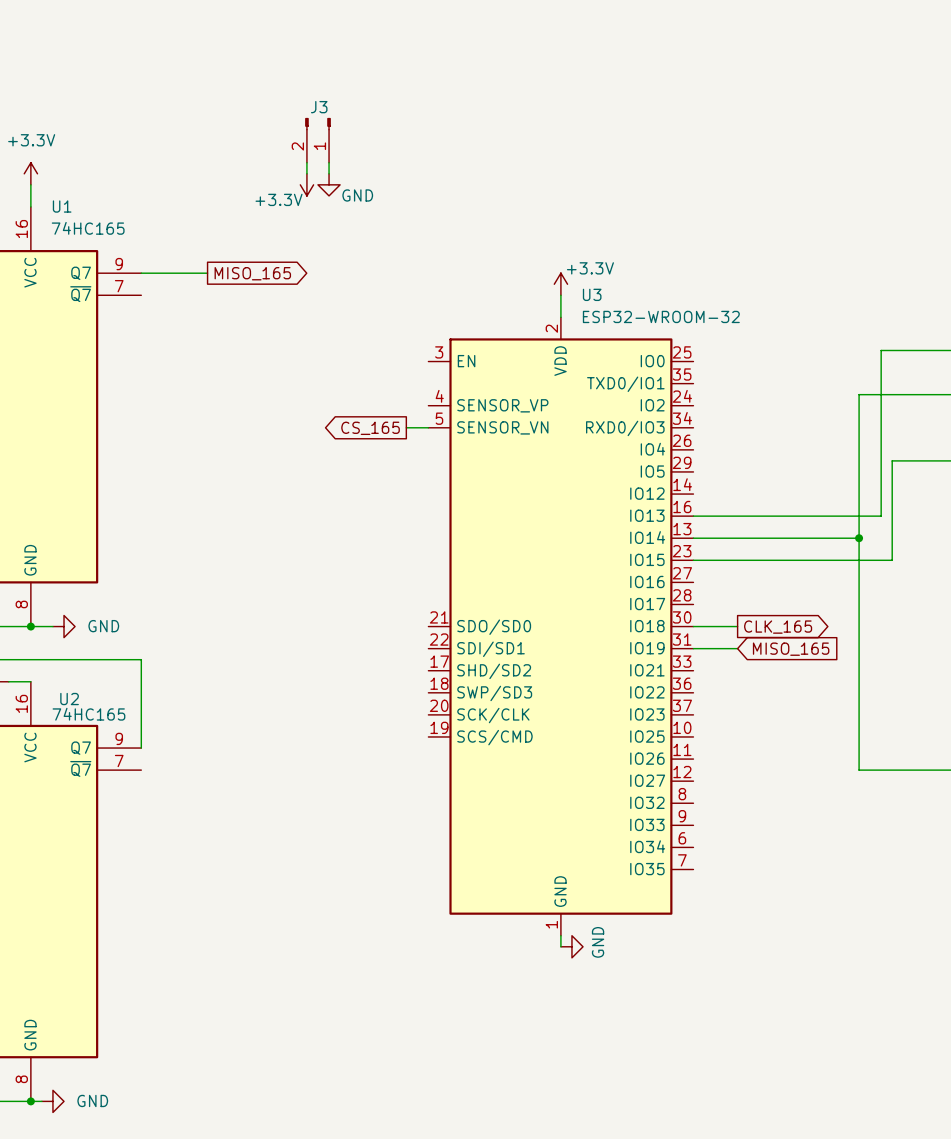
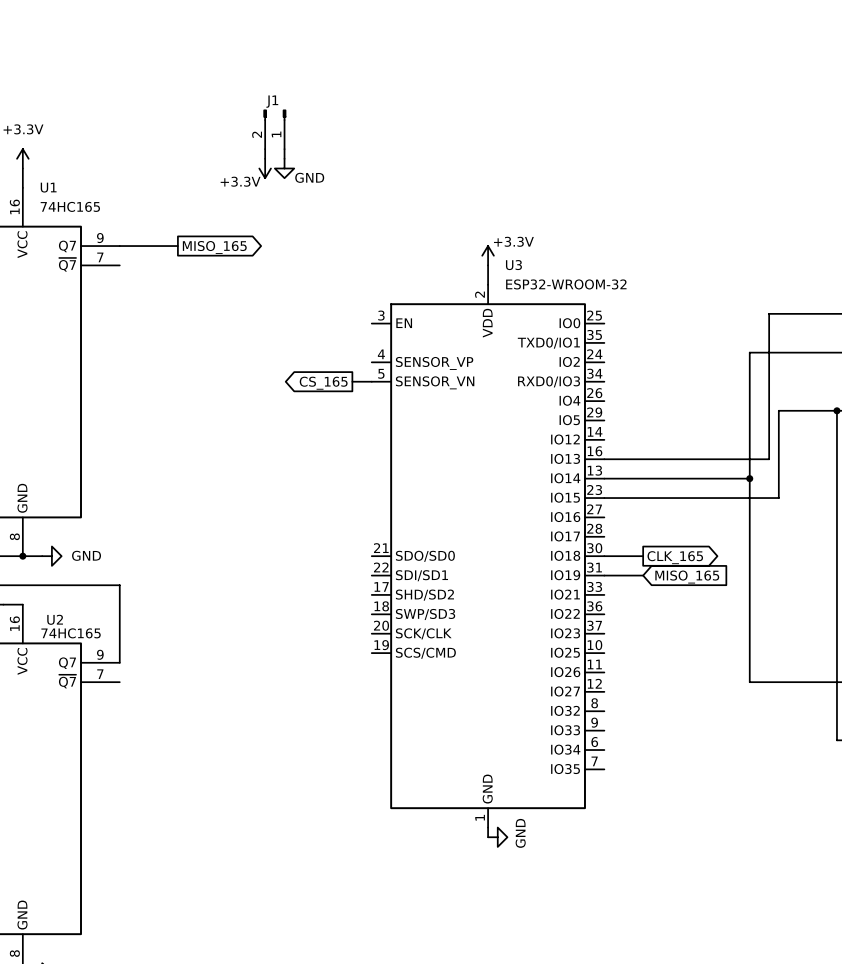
J3 name: J3 (319, 107) -> J1 (272, 101)

